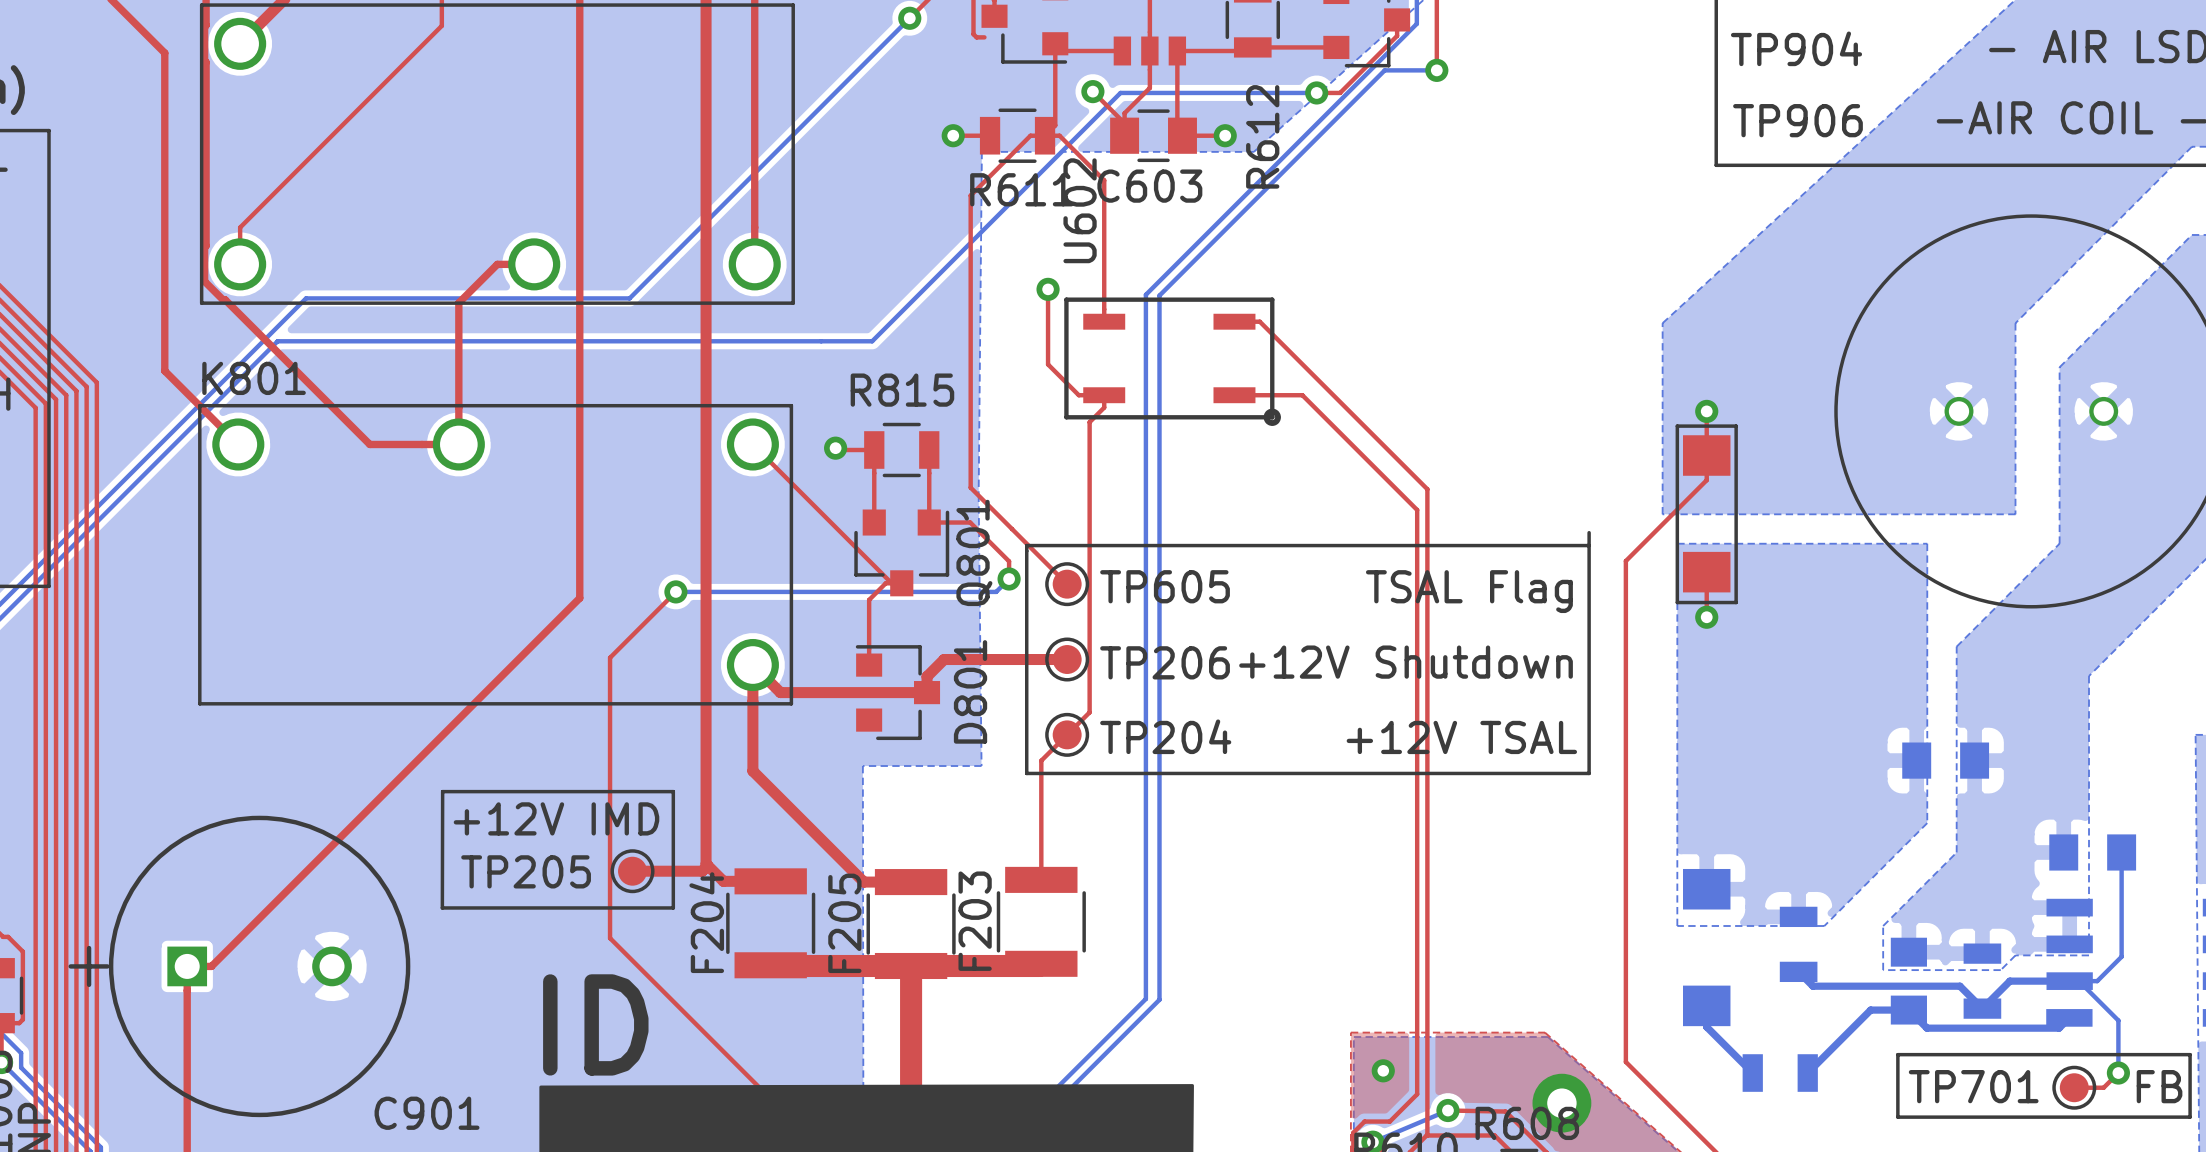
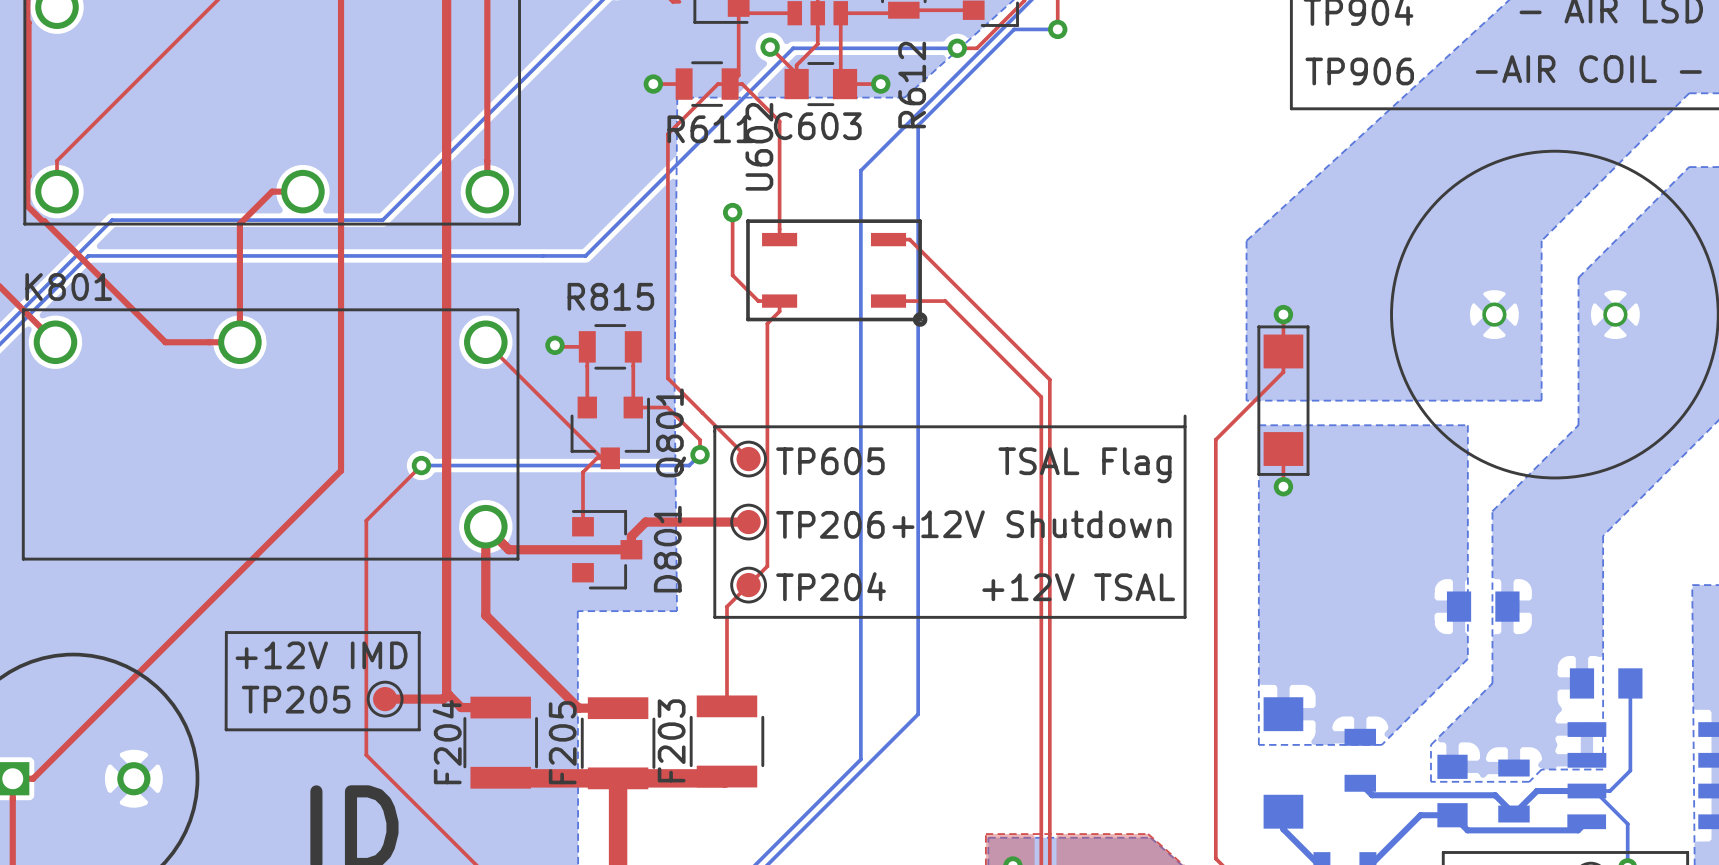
bottom track: (1269, 185) (1159, 295) (1159, 999) -> (918, 125) (918, 714) (825, 806)
bottom track: (1201, 239) (1145, 294) (1145, 998) -> (860, 170) (860, 759) (814, 805)

